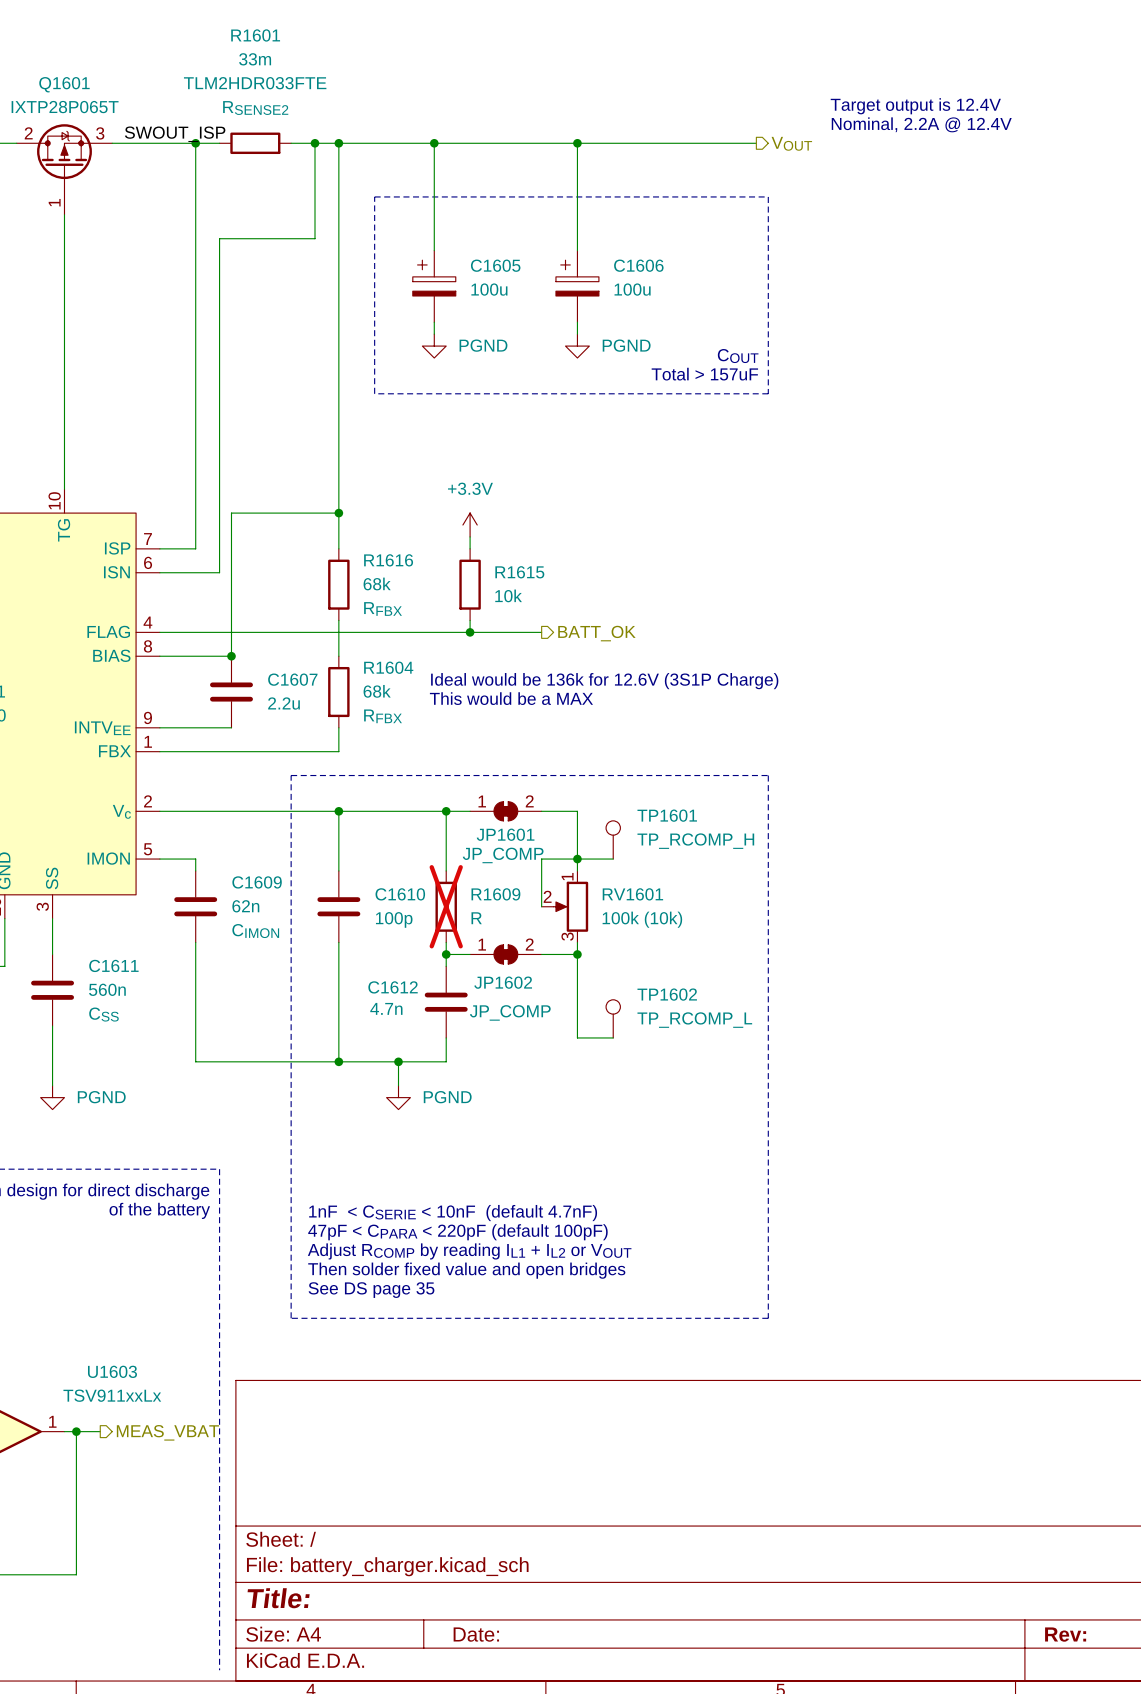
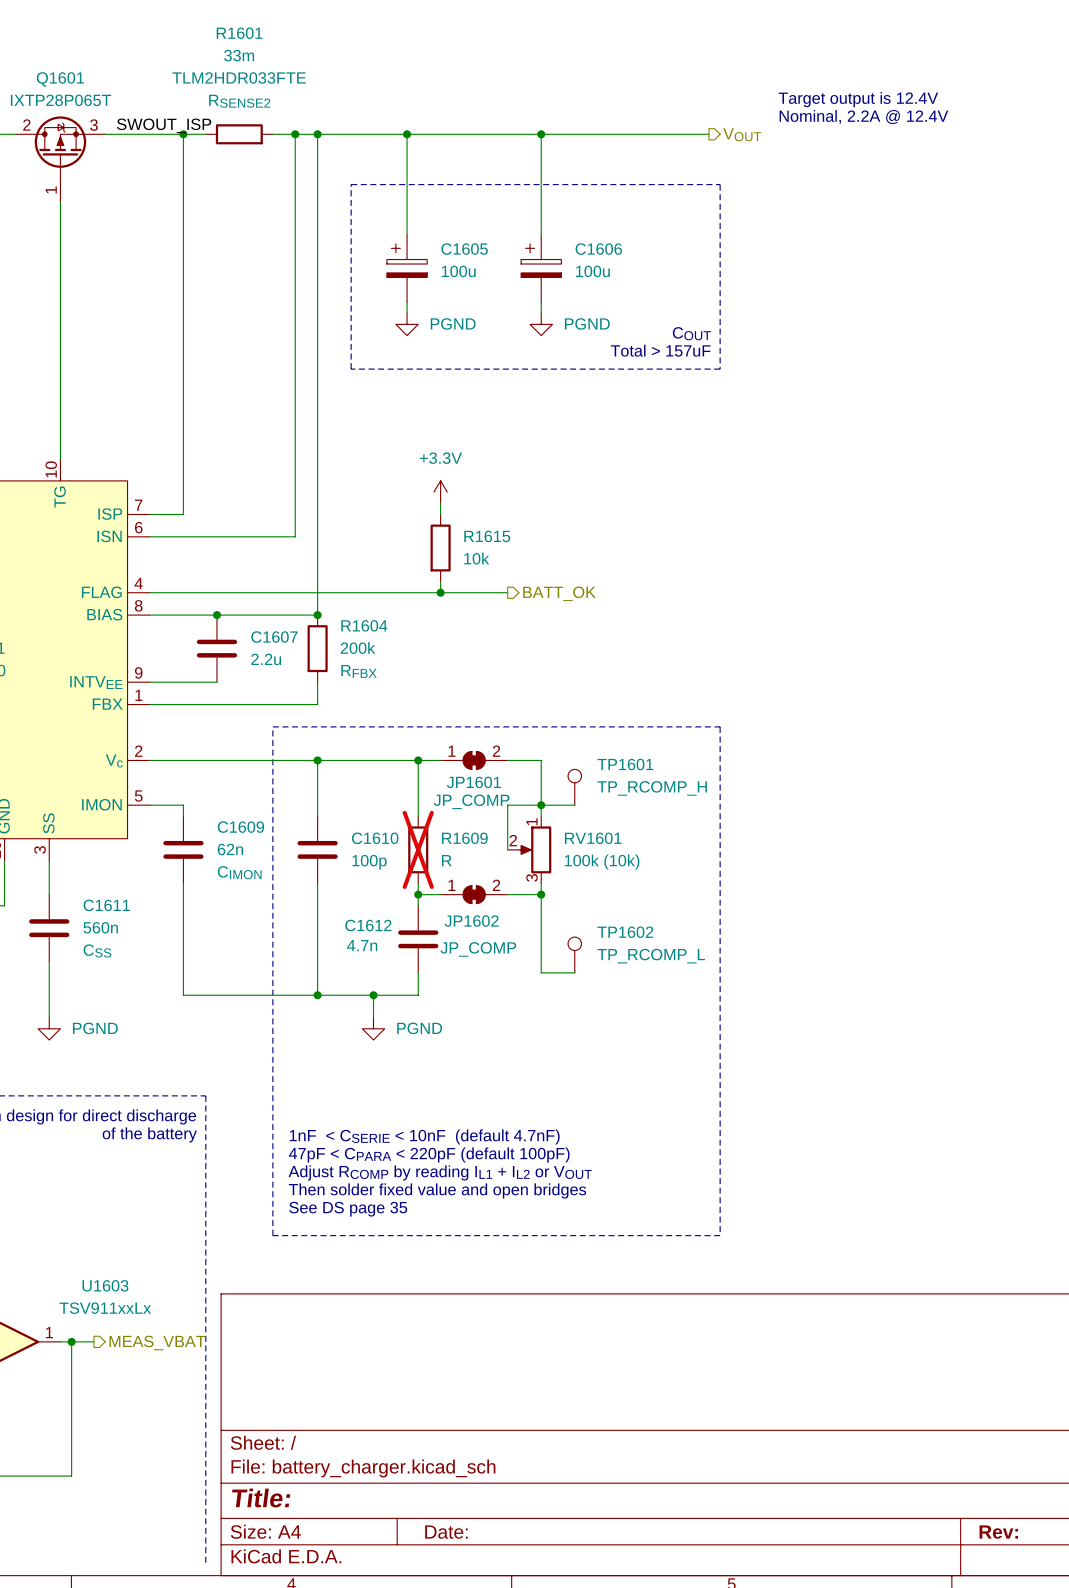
wire: (315, 238) (219, 238) (219, 572) -> (295, 223) (295, 536) (205, 536)
wire: (338, 513) (231, 513) (231, 656) -> (317, 615) (216, 615)
junction: (338, 513) -> none
wire: none -> (317, 514) (317, 581)
R1616: 68k (338, 584) -> none
junction: none -> (317, 615)
text: Ideal would be 136k for 12.6V (3S1P Charge) (604, 681) -> none
R1604 value: 68k (377, 691) -> 200k (358, 648)
text: This would be a MAX (511, 698) -> none

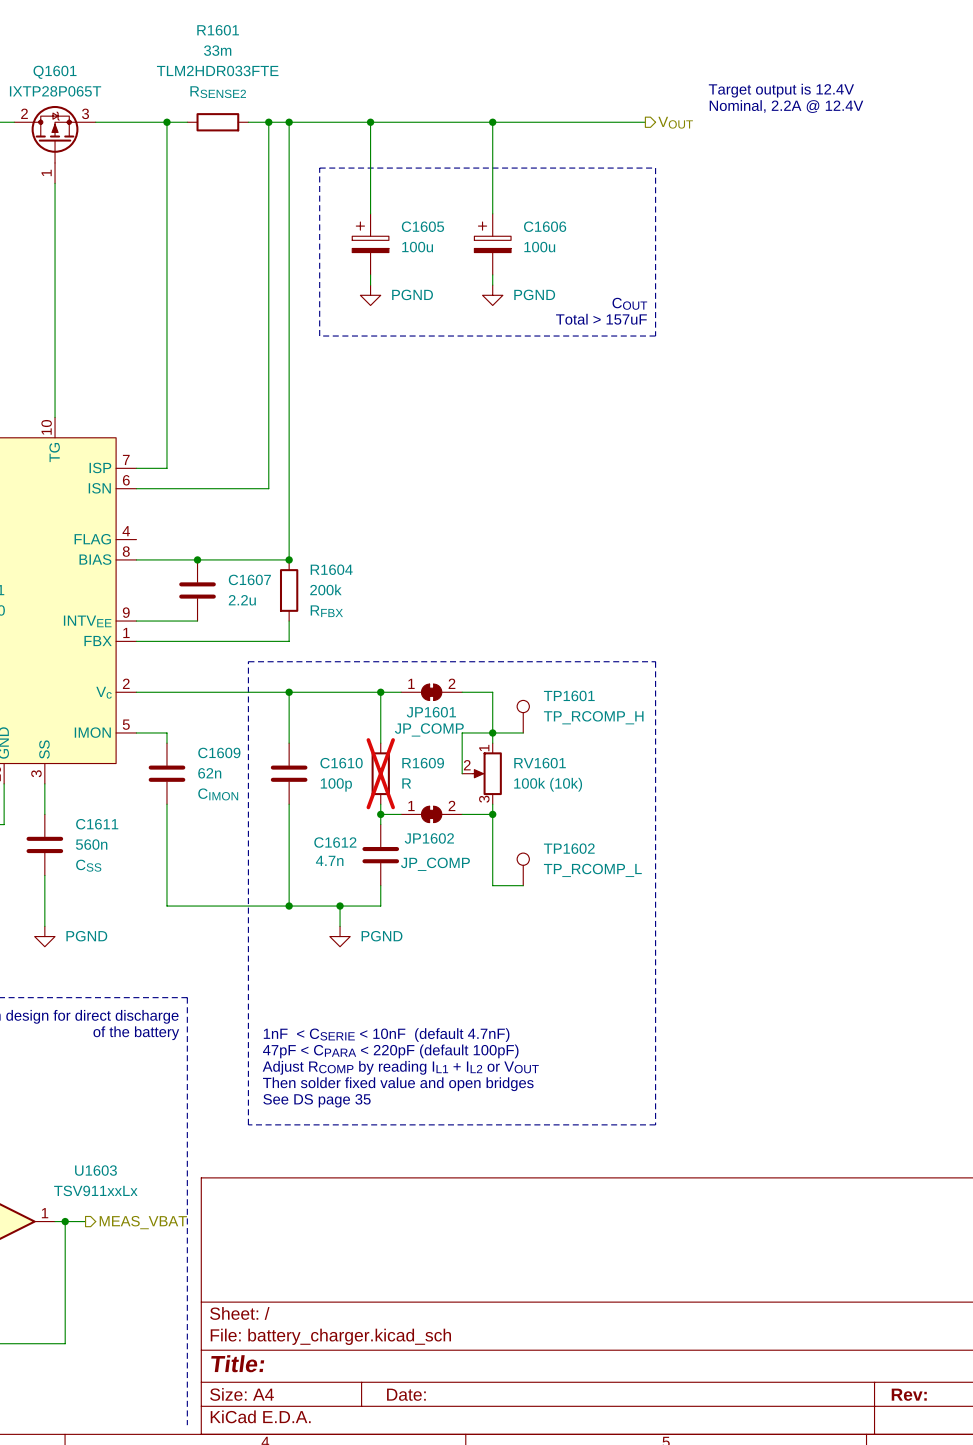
label: SWOUT_ISP (164, 125) -> none
power symbol: +3.3V (440, 492) -> none
wire: (440, 503) (440, 514) -> none
R1615: 10k (440, 548) -> none
wire: (440, 581) (440, 592) -> none
wire: (149, 592) (507, 592) -> none
junction: (440, 592) -> none
hierarchical label: BATT_OK (559, 593) -> none

